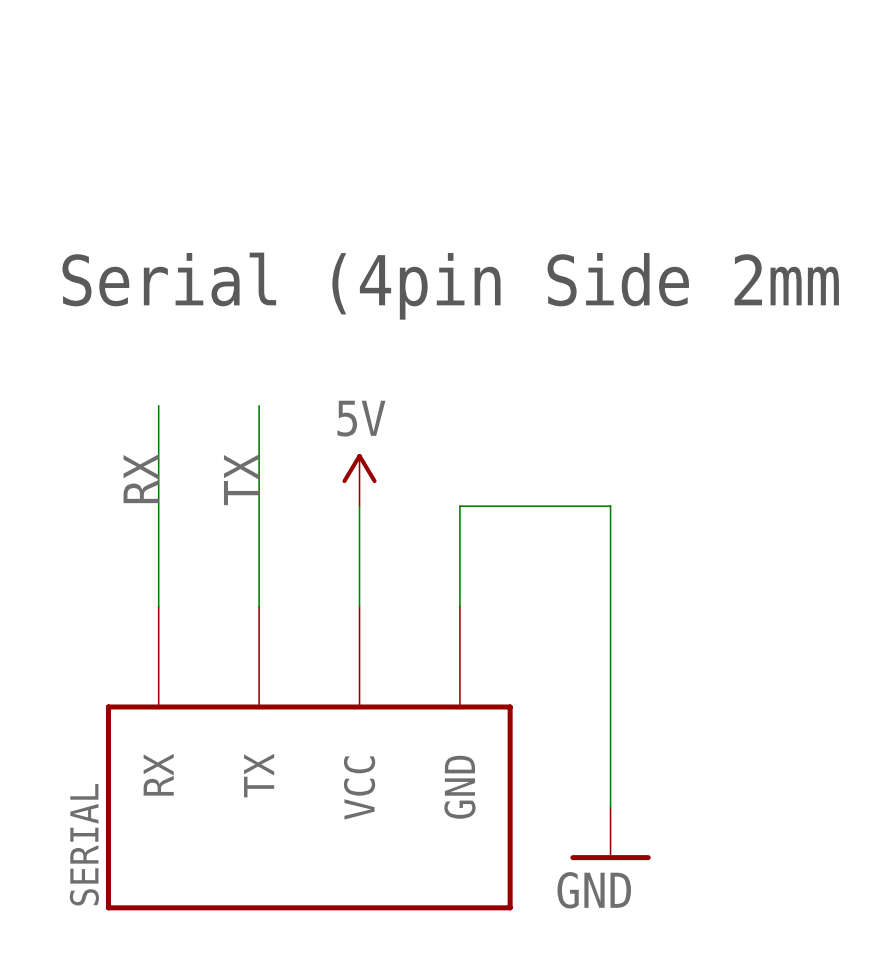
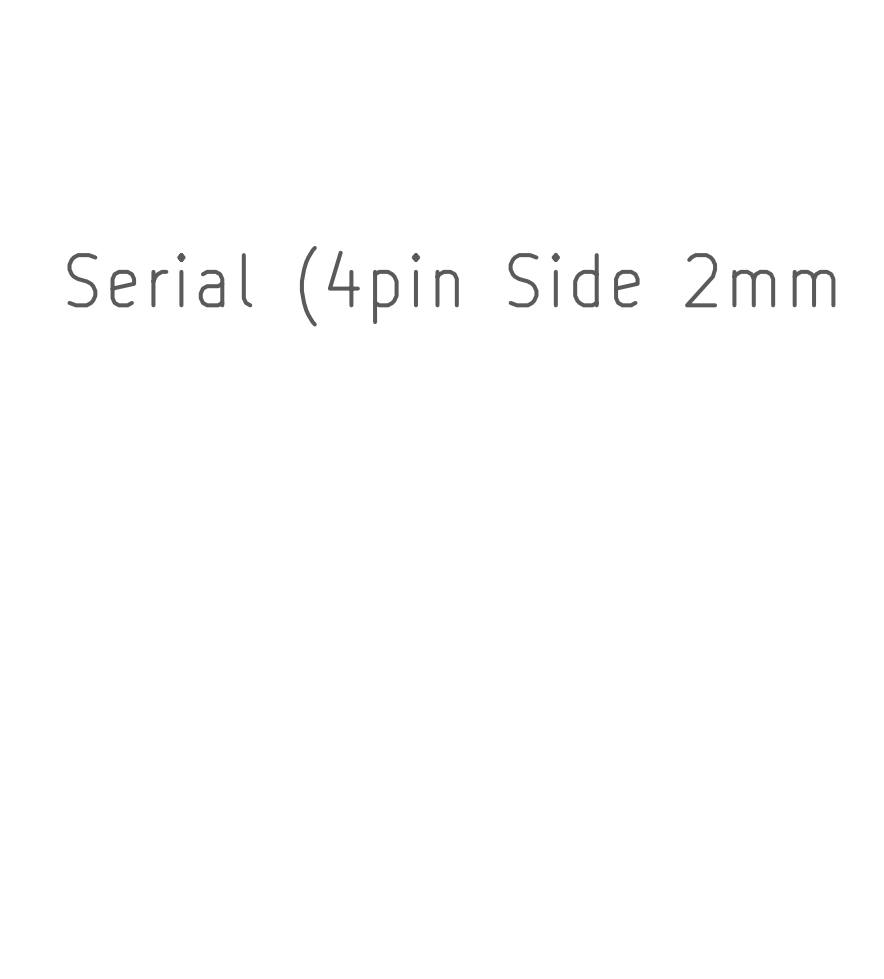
wire: (158, 405) (158, 606) -> none
wire: (259, 405) (259, 606) -> none
label: RX (141, 478) -> none
label: TX (241, 479) -> none
power symbol: 5V (359, 480) -> none
wire: (359, 506) (359, 606) -> none
wire: (459, 606) (459, 506) (610, 506) (610, 807) -> none
SERIAL: (309, 758) -> none
power symbol: GND (610, 833) -> none

